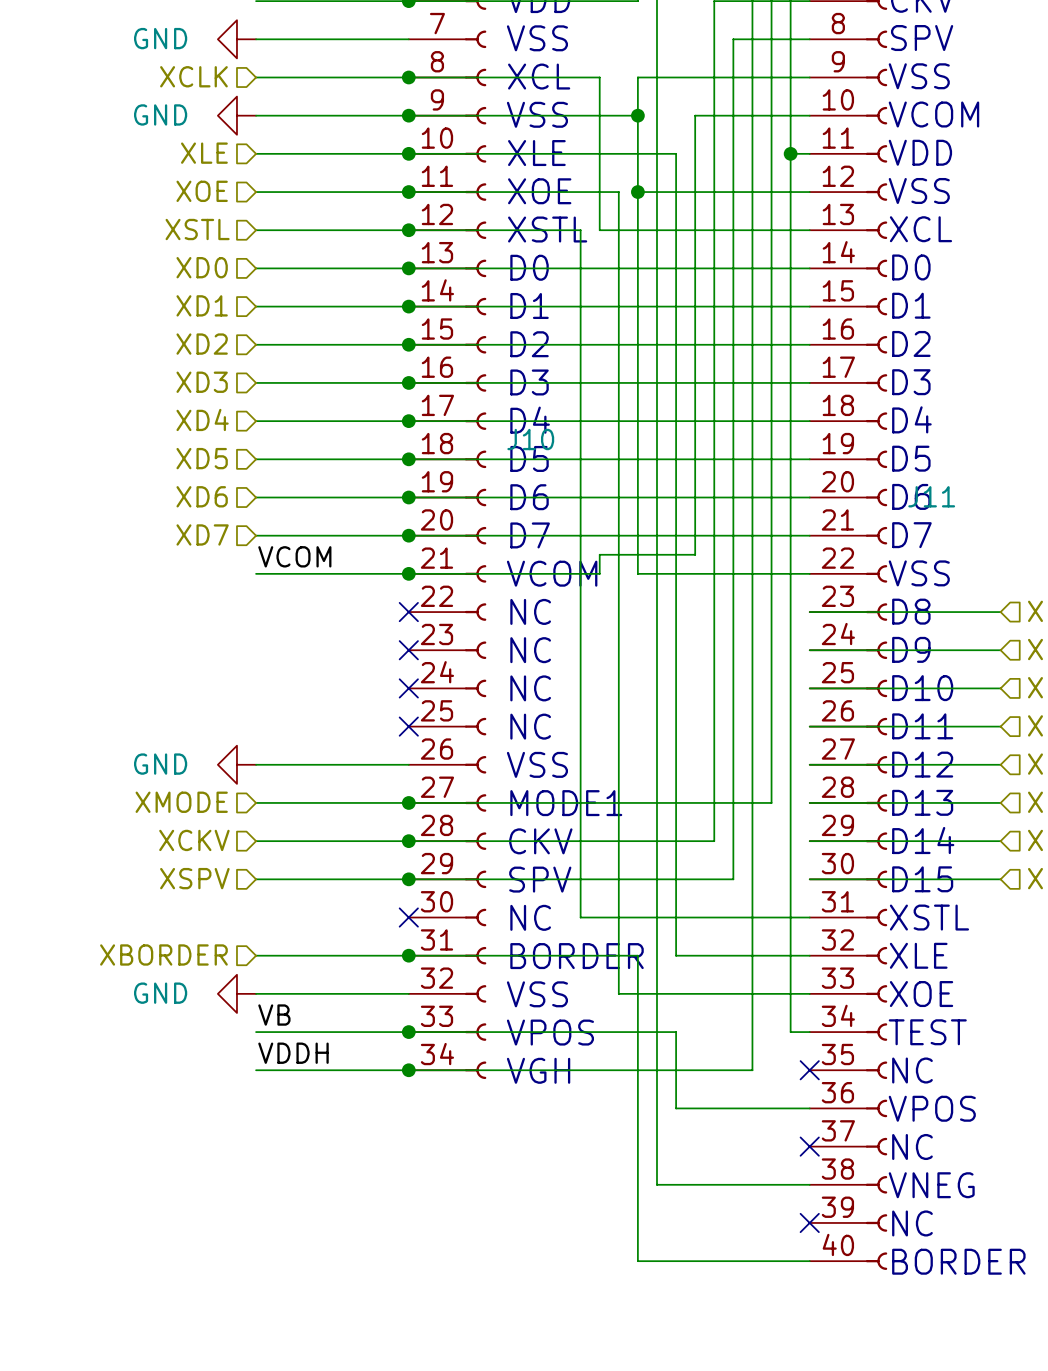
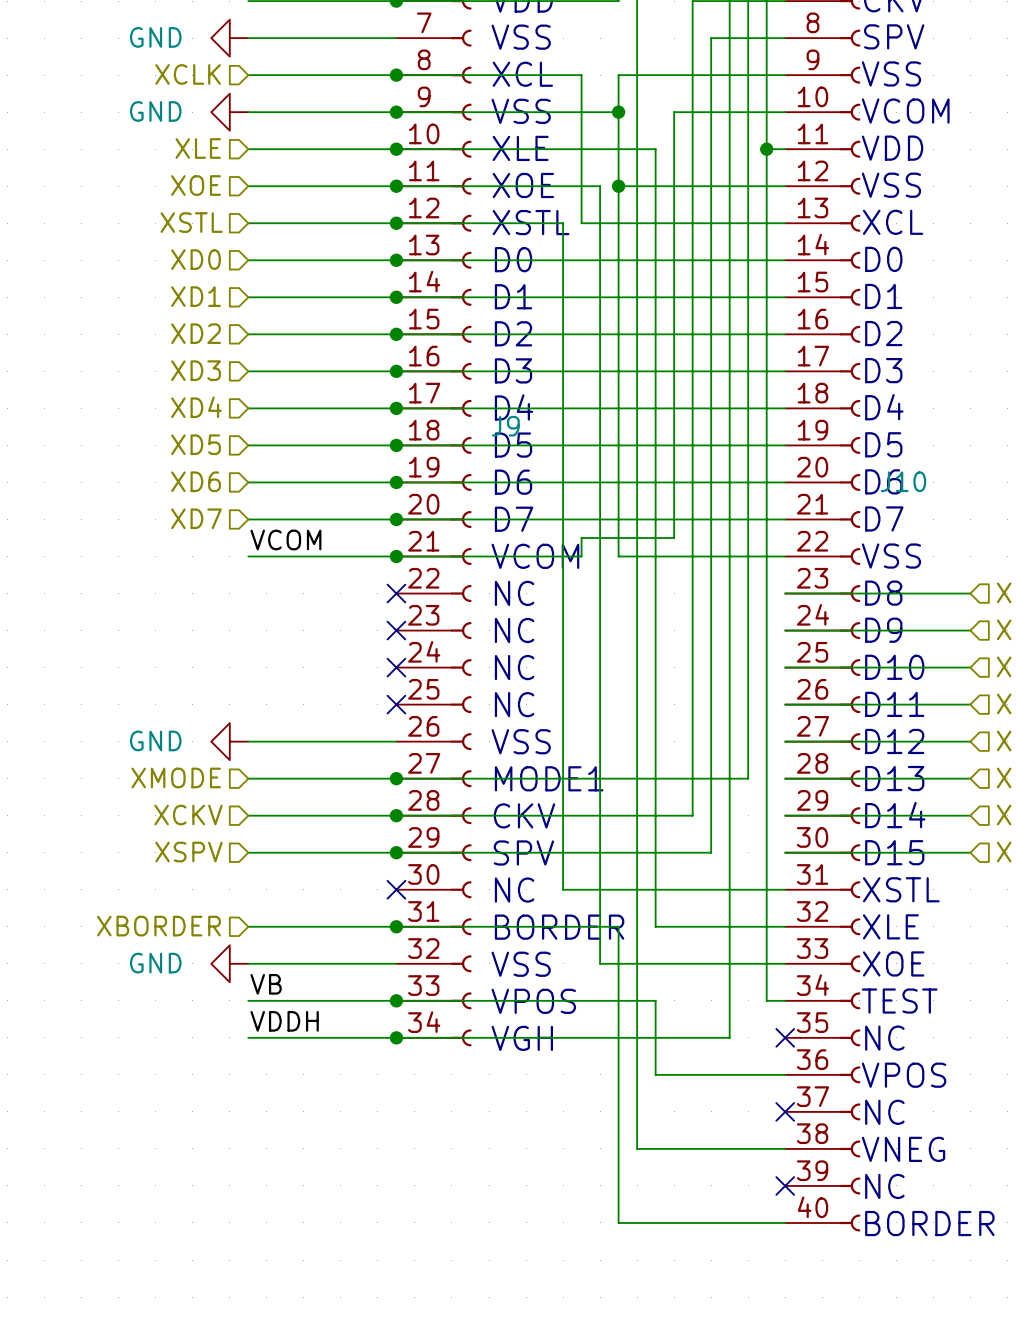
J10 name: J10 (530, 439) -> J9 (505, 426)
J11 name: J11 (931, 496) -> J10 (903, 481)

